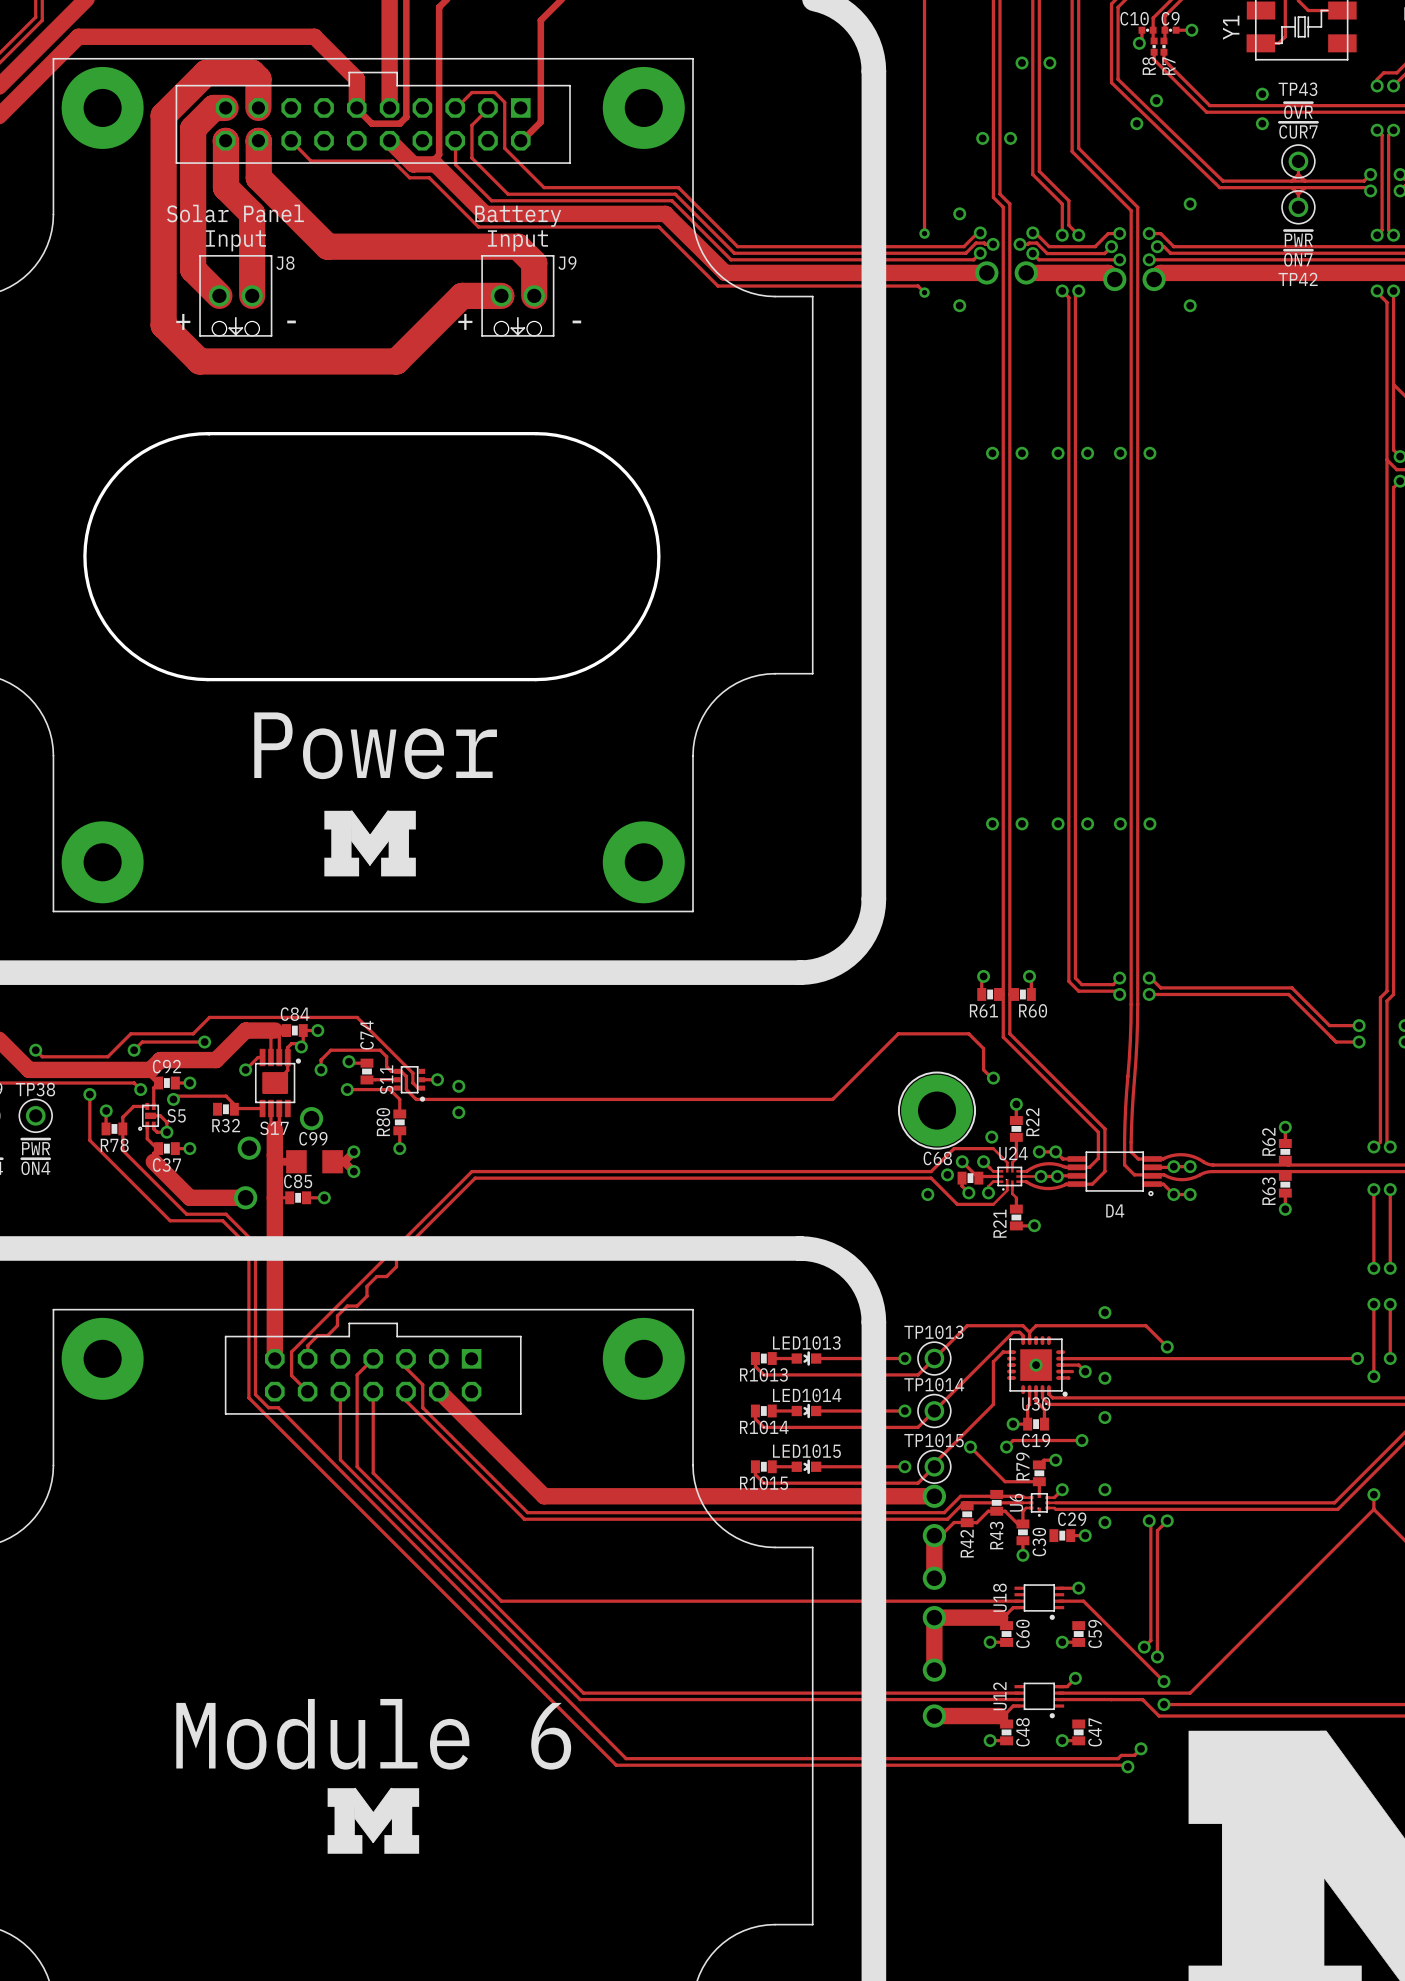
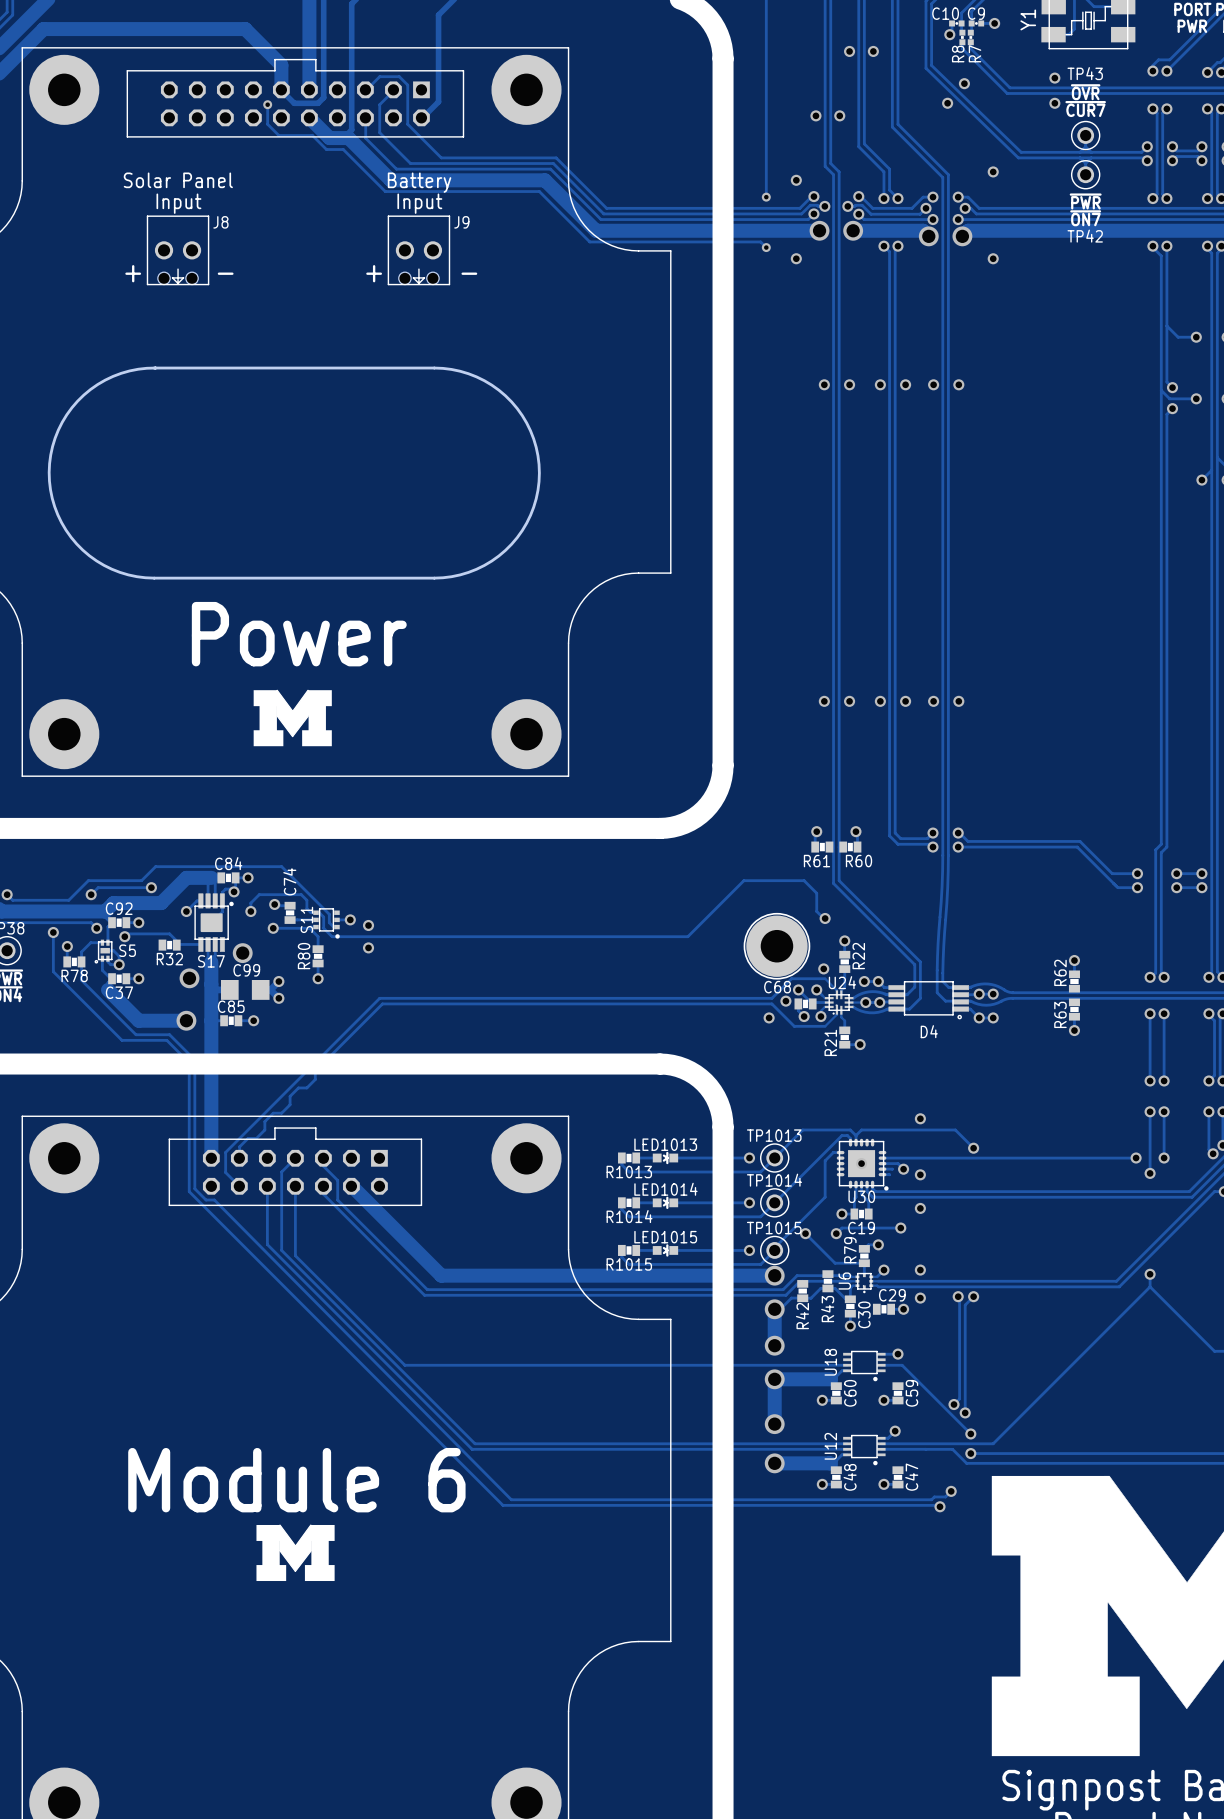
track: (225, 107) (213, 107) (193, 128) (193, 269) (219, 295) -> none
track: (258, 107) (258, 79) (252, 72) (206, 72) (163, 115) (163, 325) (199, 361) (396, 361) (462, 295) (501, 295) -> none
via: none -> (267, 104)
track: (225, 140) (225, 187) (252, 213) (252, 295) -> none
track: (291, 140) (311, 161) (392, 161) -> (267, 104) (267, 124) (278, 135) (312, 135)
track: (258, 141) (258, 177) (327, 246) (517, 246) (534, 263) (534, 295) -> none

